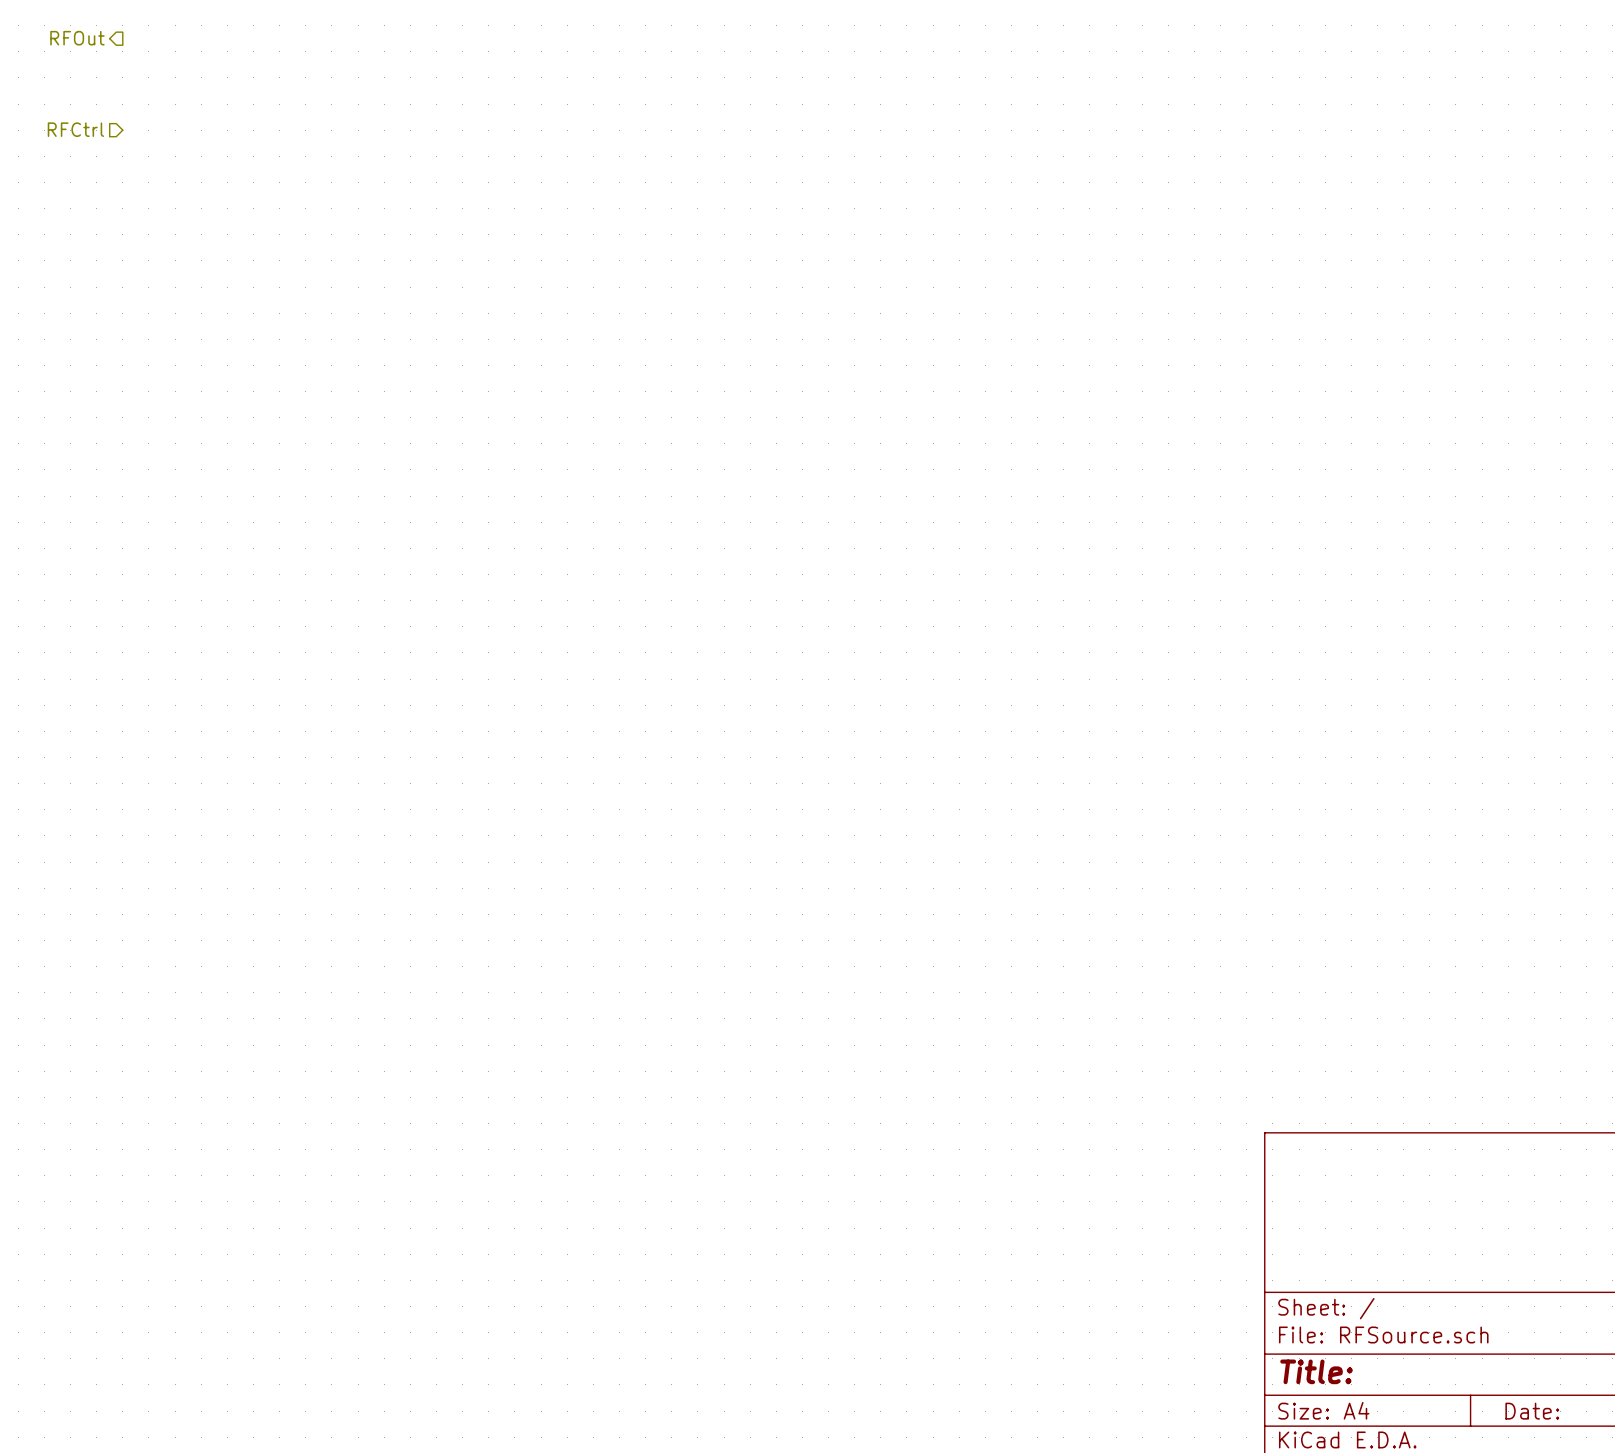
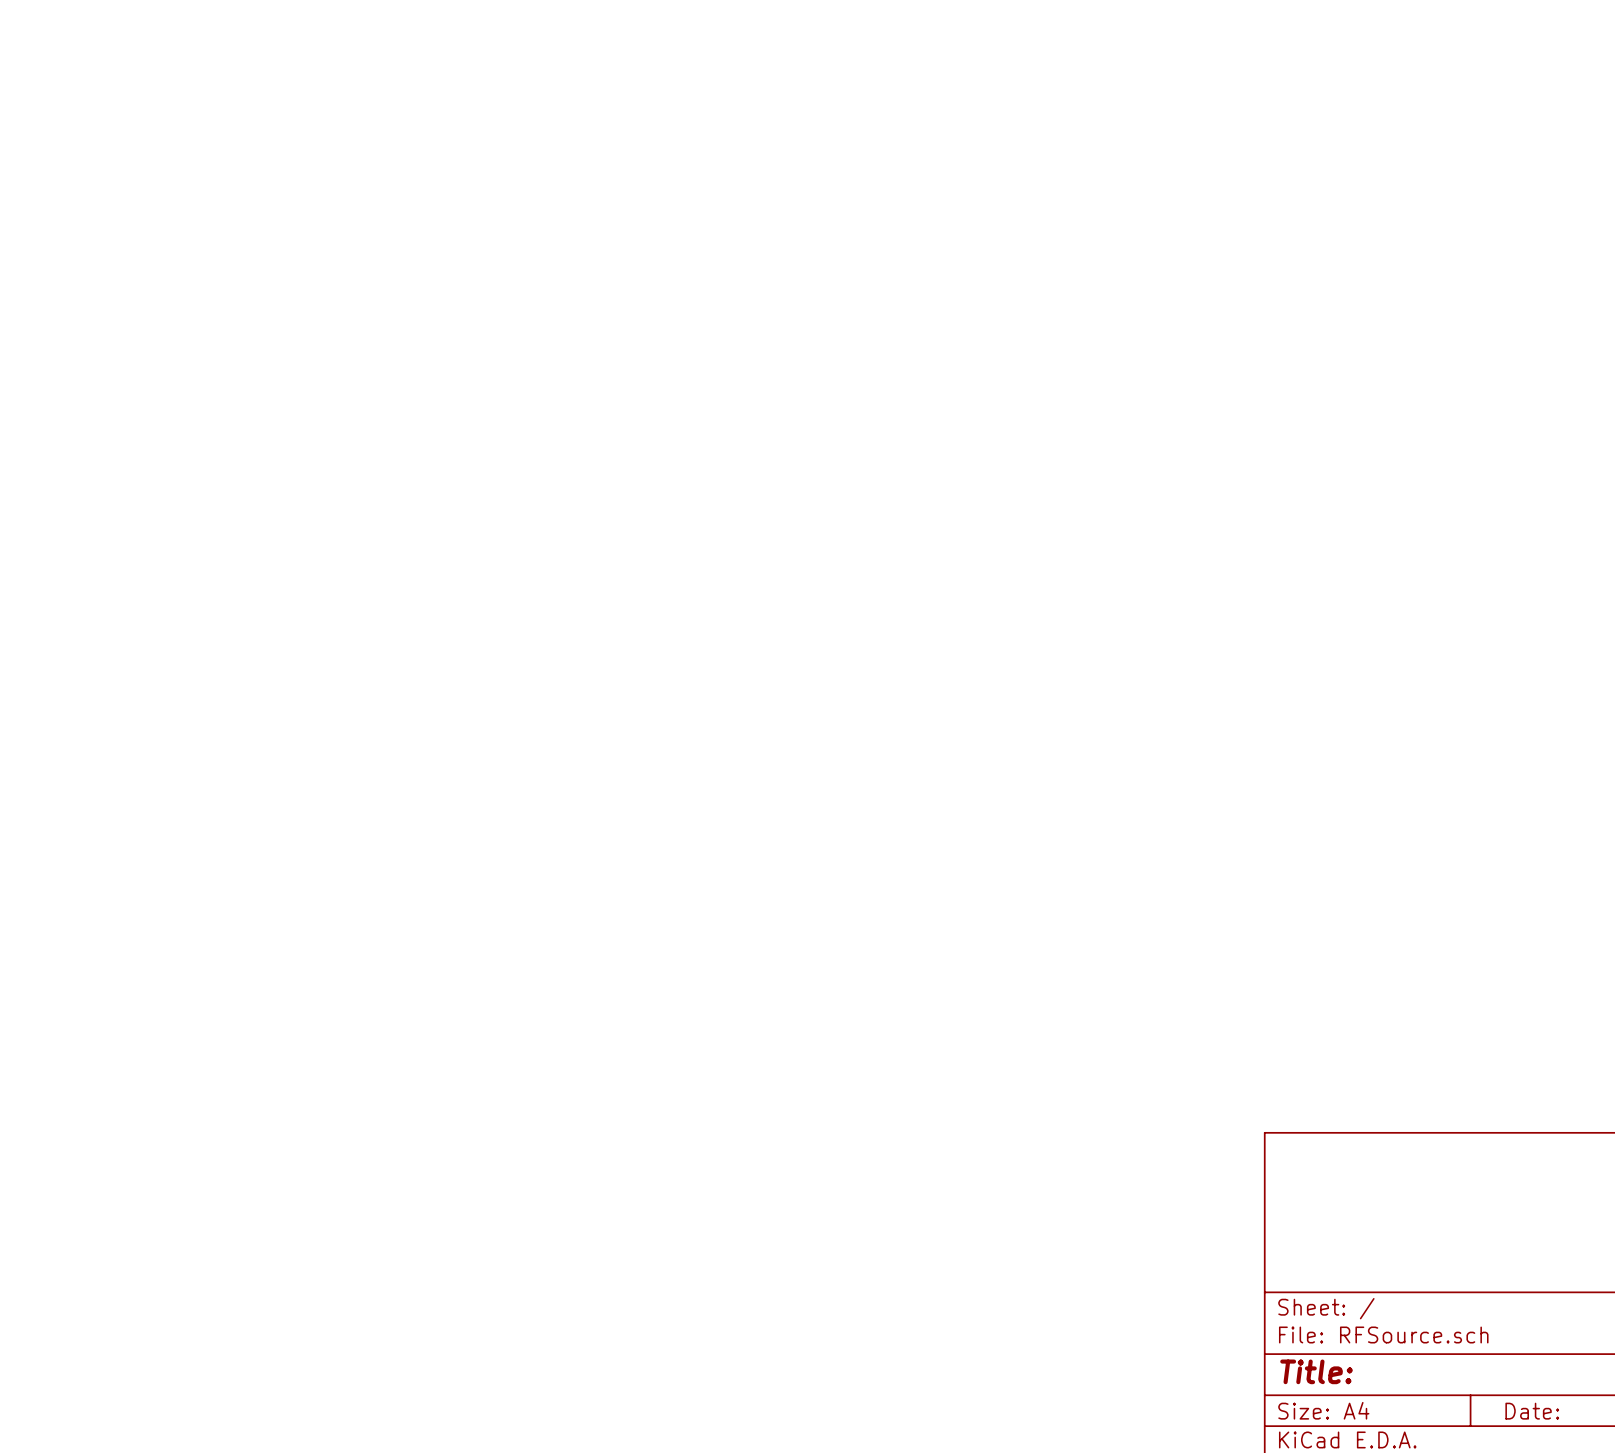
hierarchical label: RFOut (77, 38) -> none
hierarchical label: RFCtrl (75, 129) -> none

